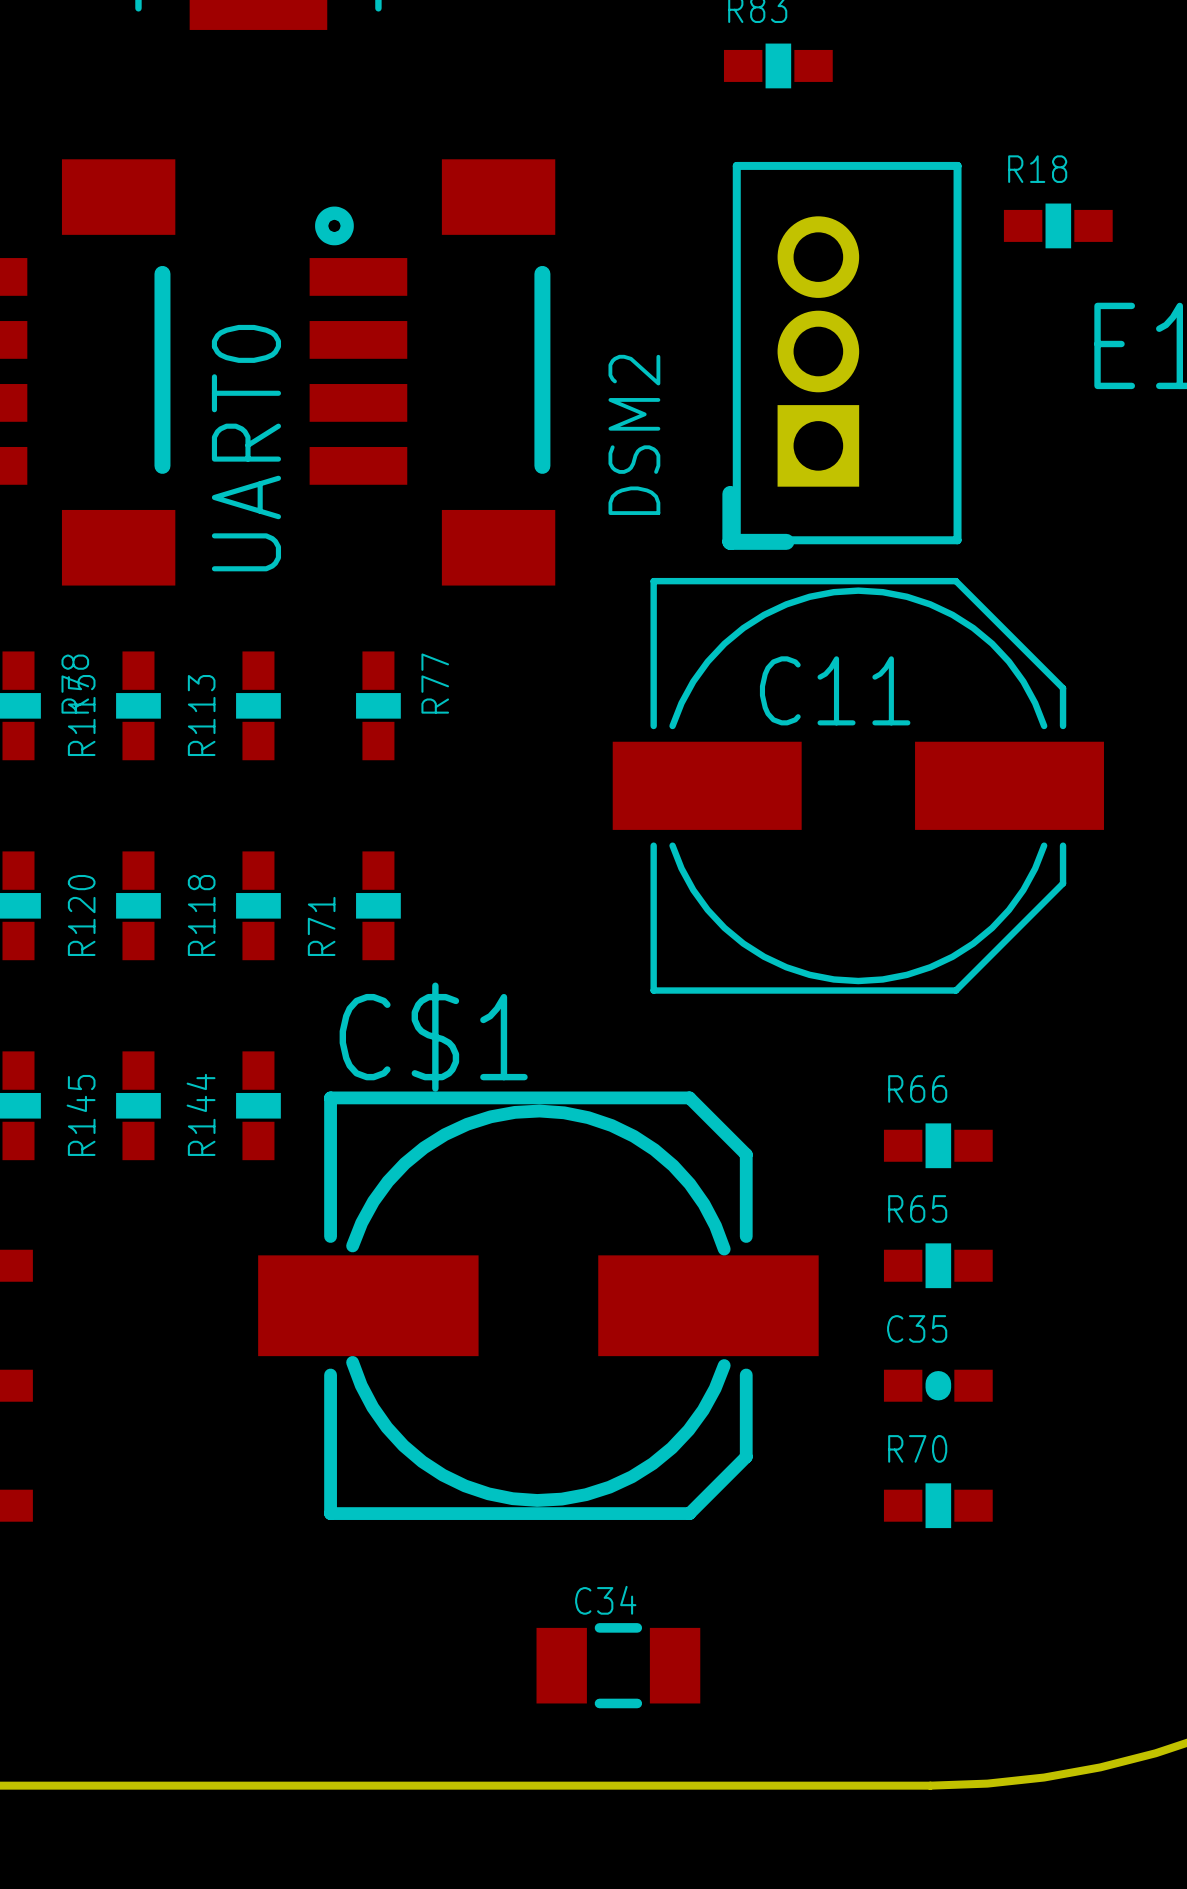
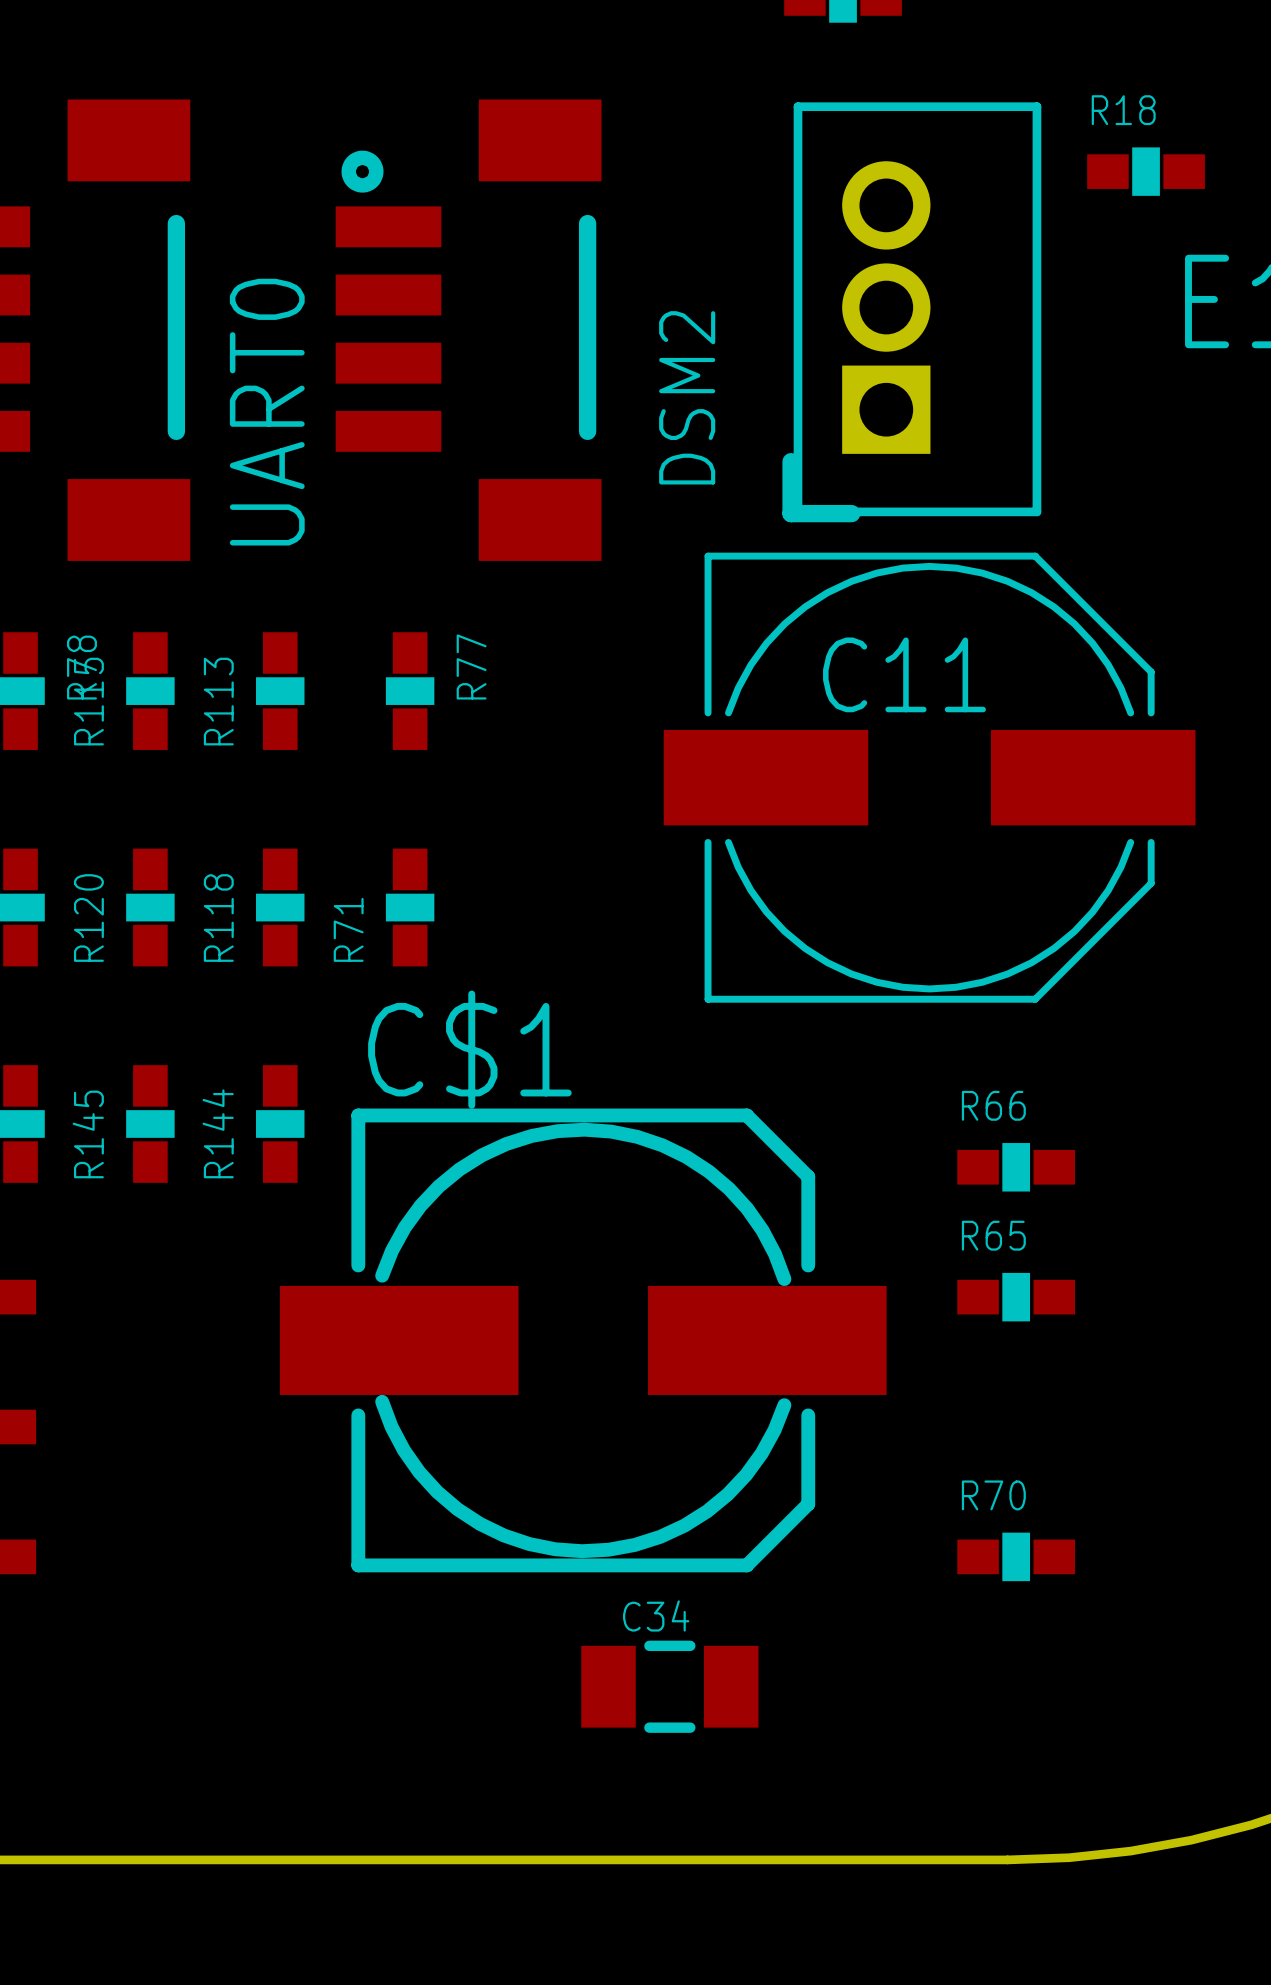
C35: (938, 1385) -> none
C34 position: (618, 1665) -> (669, 1686)

